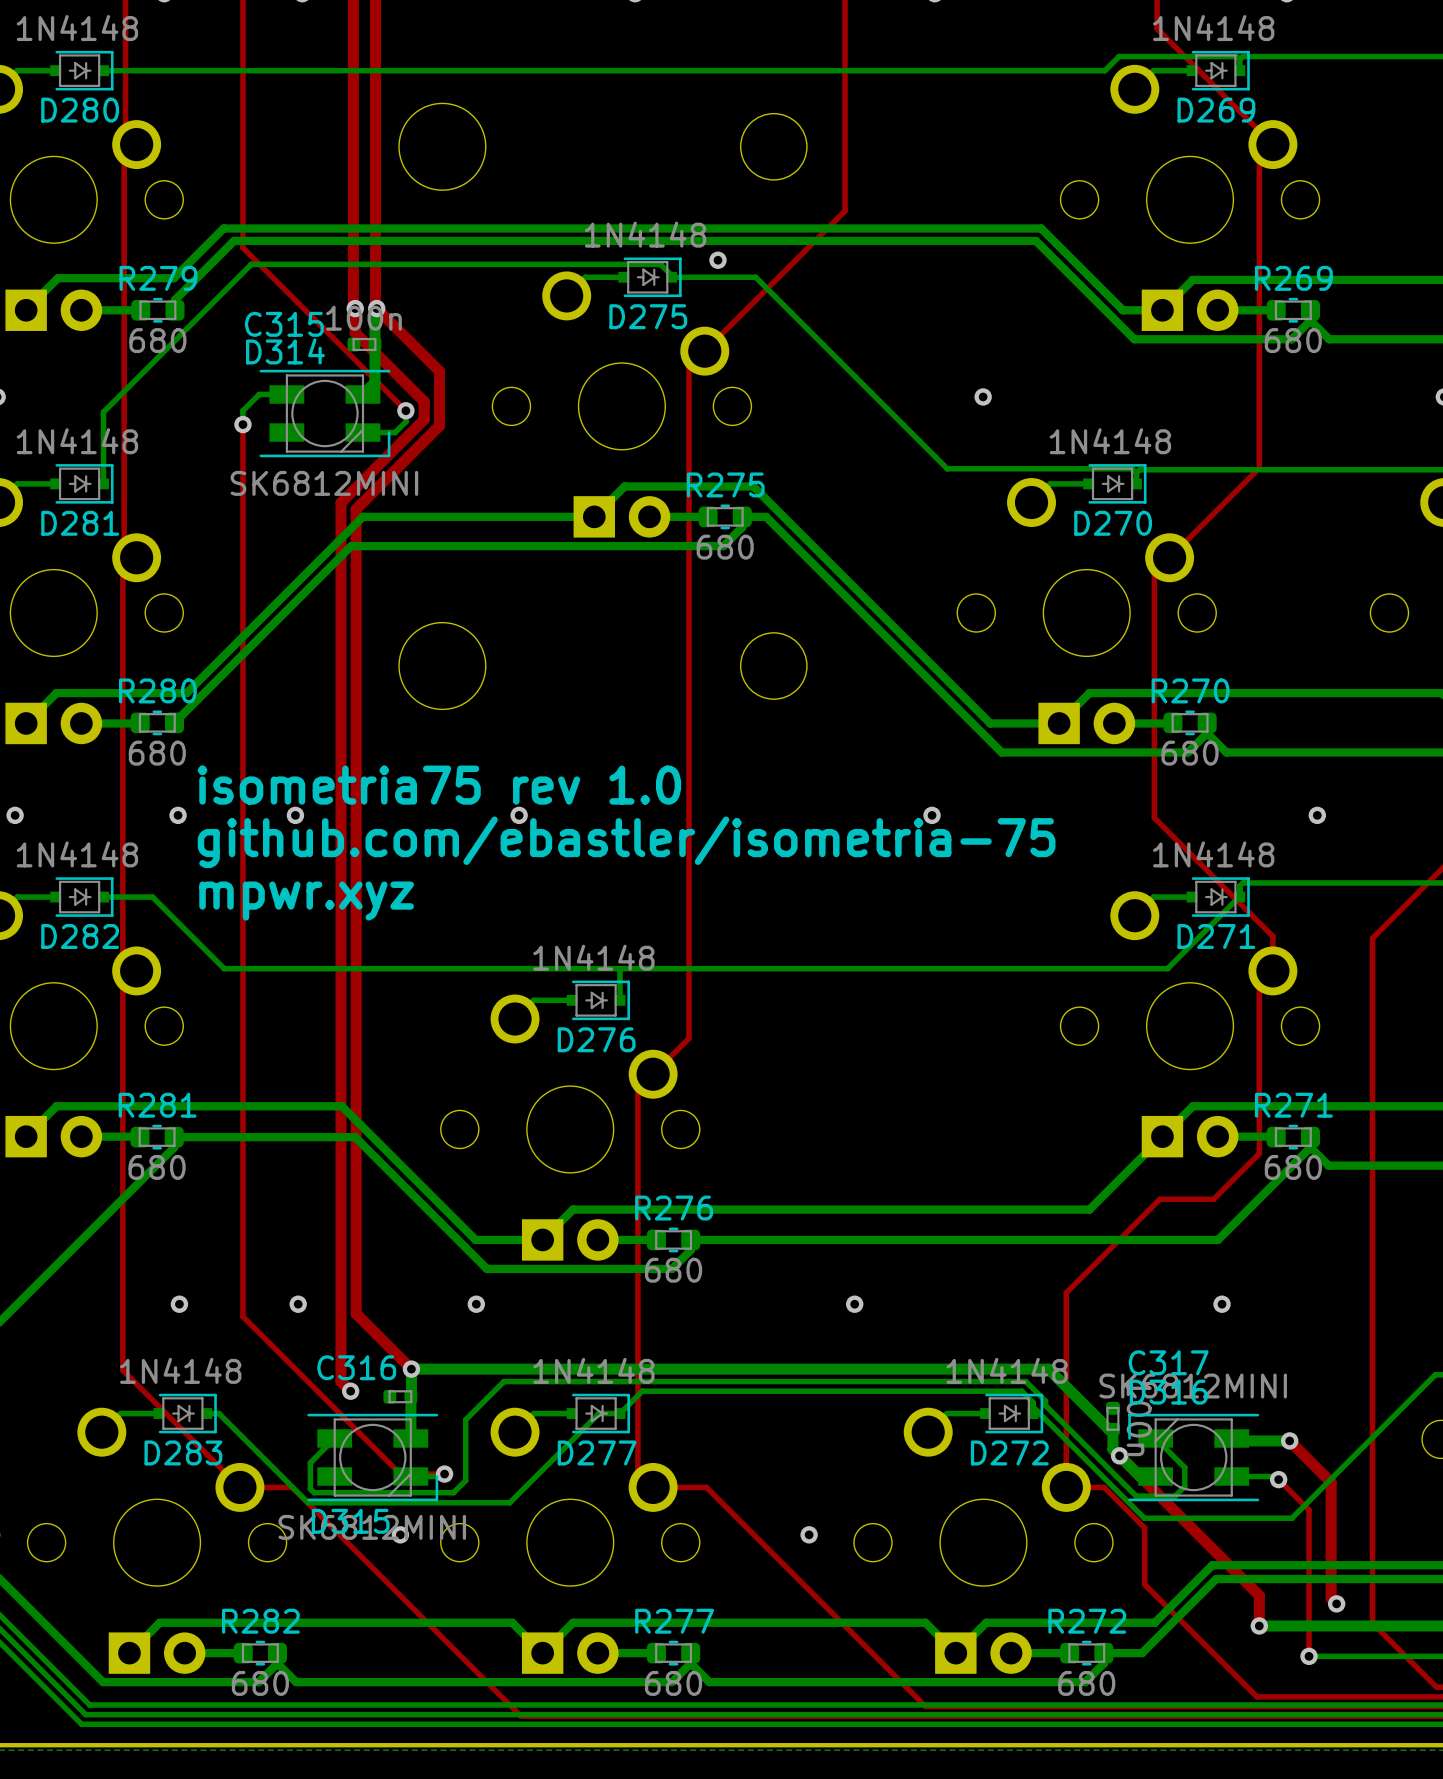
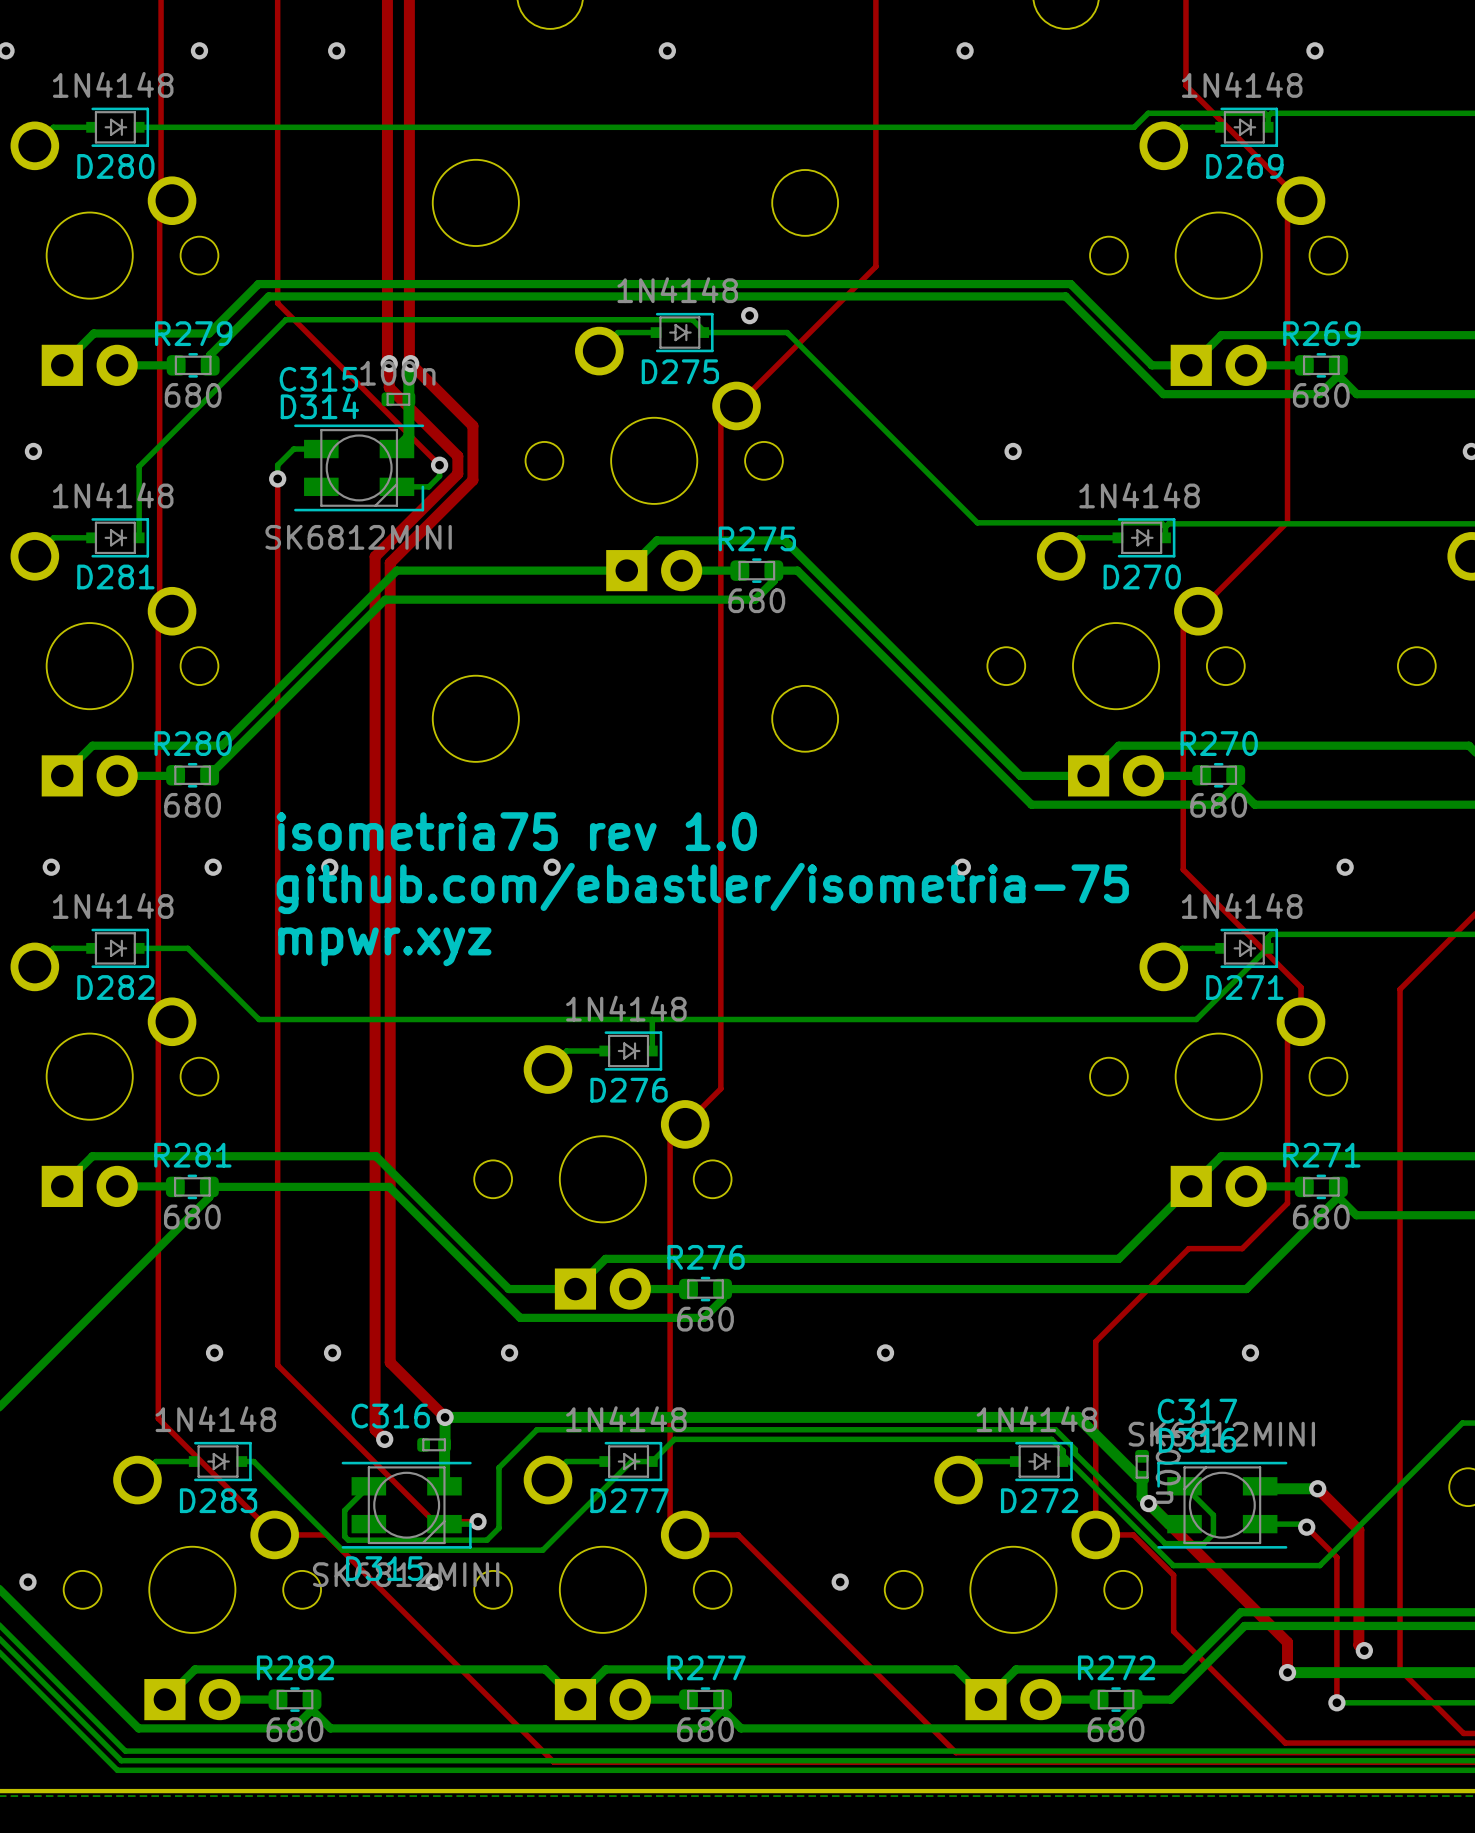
text position: isometria75 rev 1.0 (439, 785) -> isometria75 rev 1.0 (516, 831)
text position: github.com/ebastler/isometria-75 (626, 842) -> github.com/ebastler/isometria-75 (702, 888)
text position: mpwr.xyz (306, 901) -> mpwr.xyz (384, 946)

